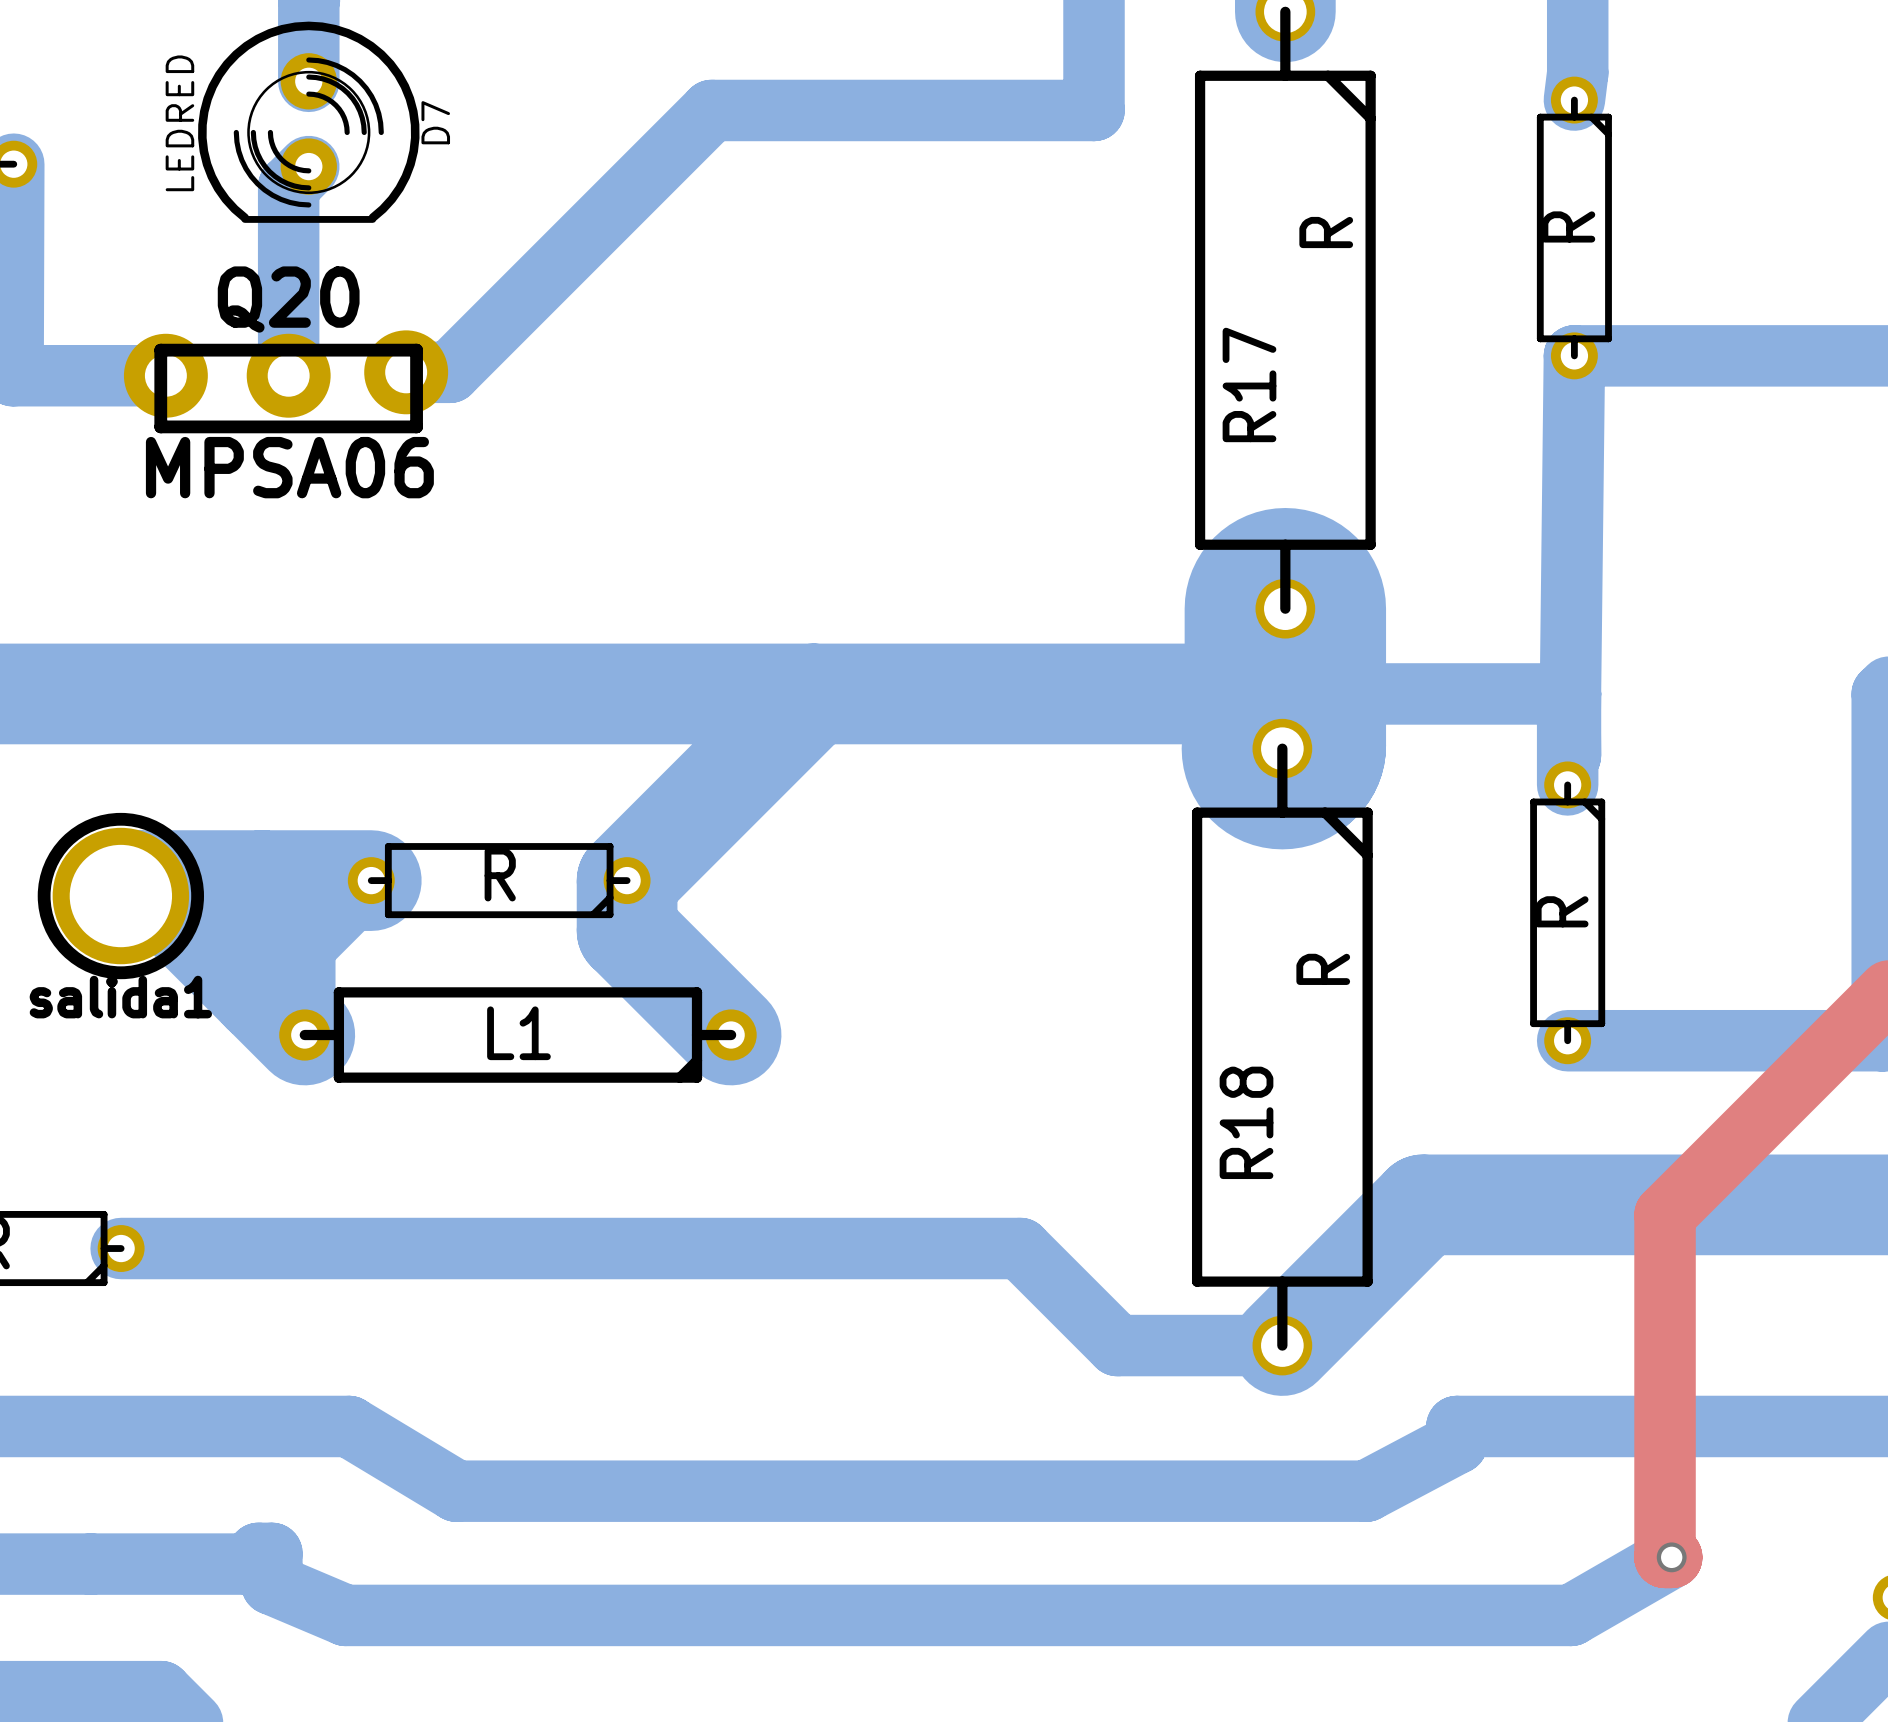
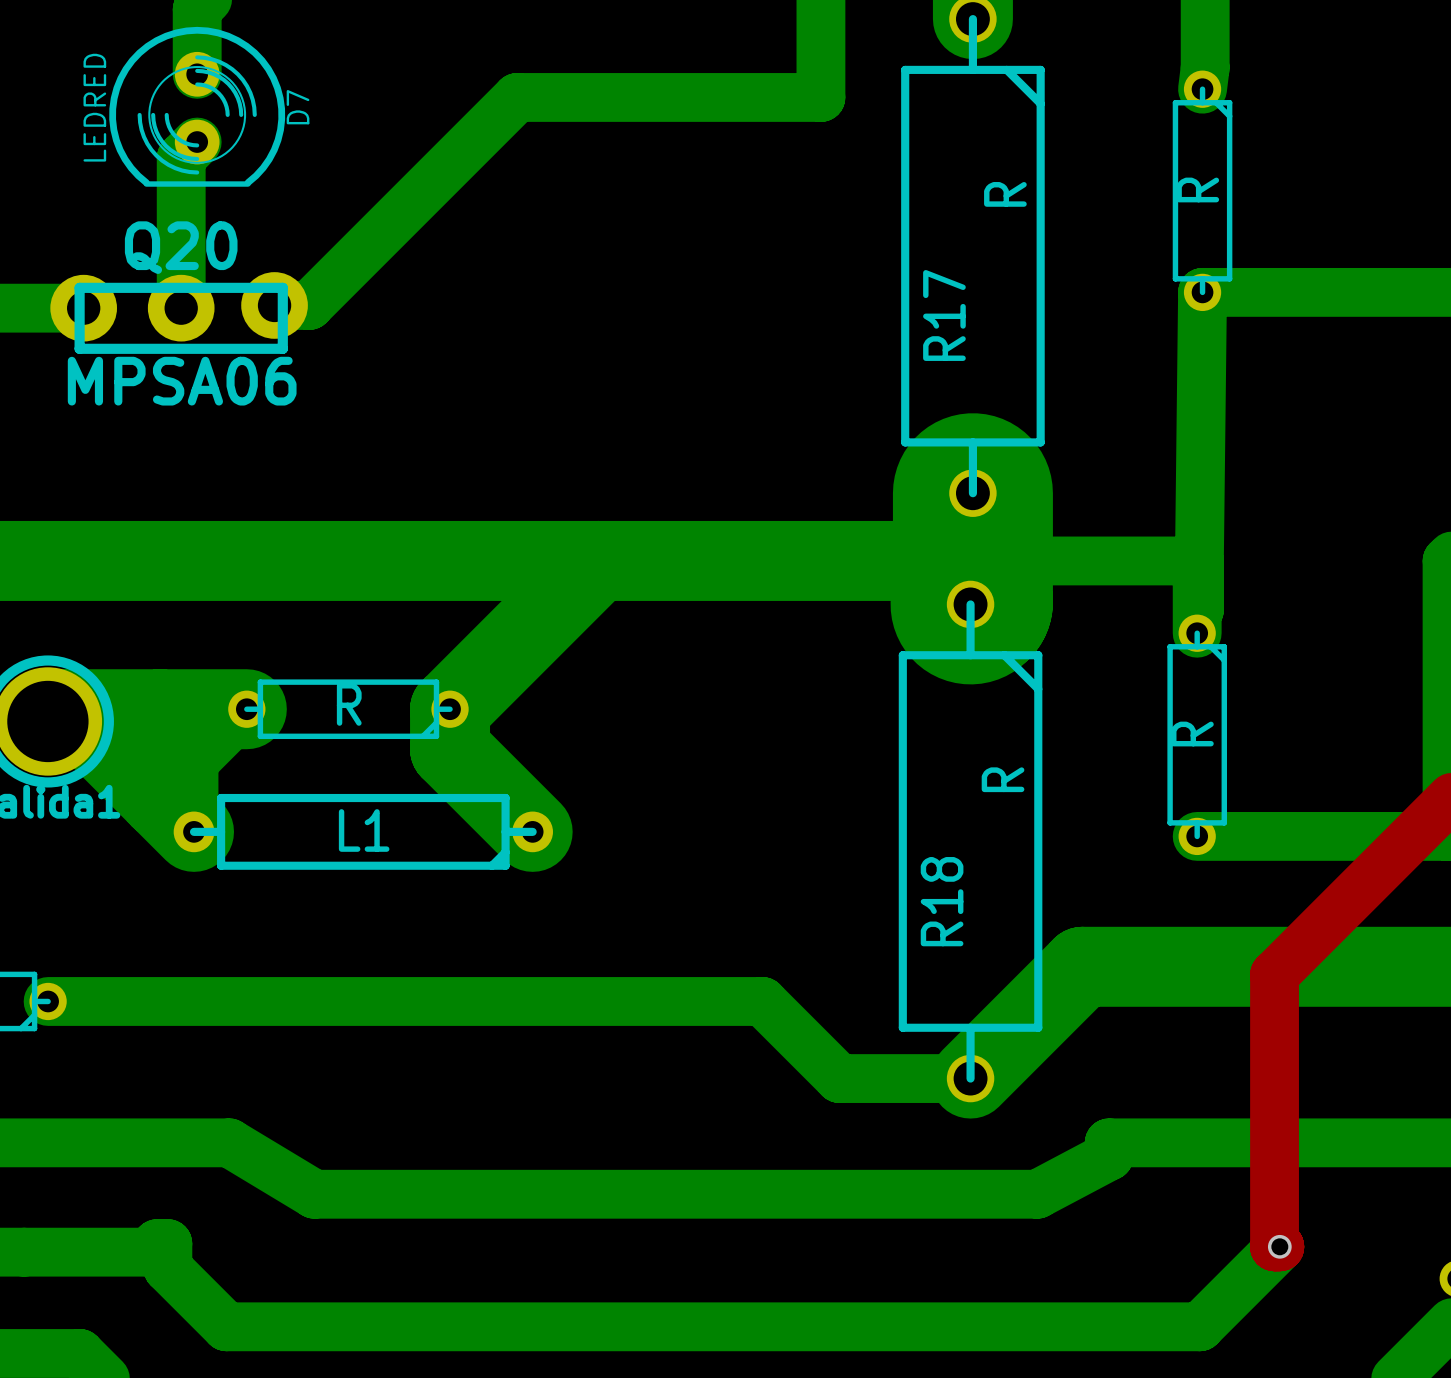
bottom track: (1671, 1557) (1570, 1615) (345, 1615) (271, 1584) -> (1279, 1246) (1199, 1326) (226, 1326) (167, 1268)

